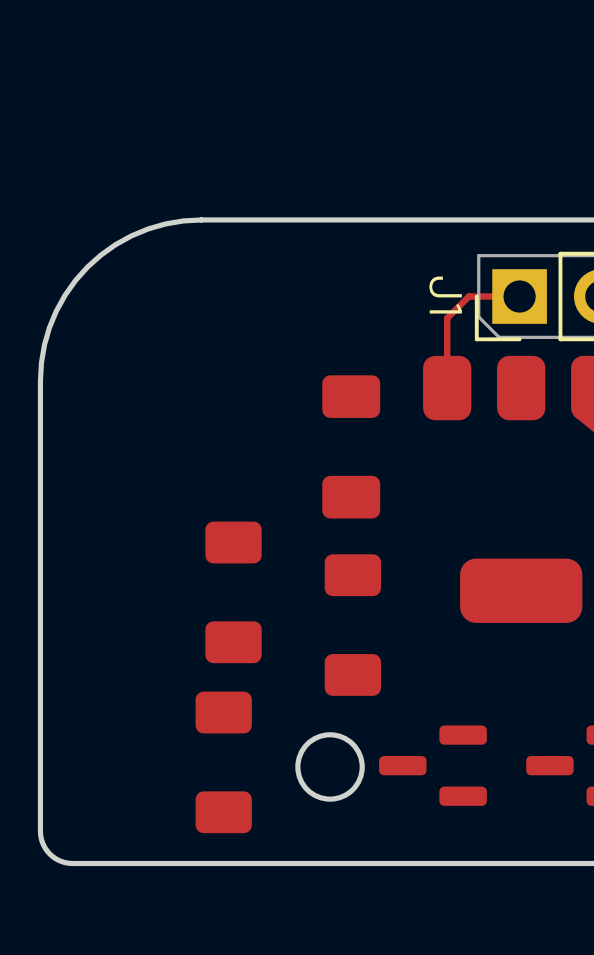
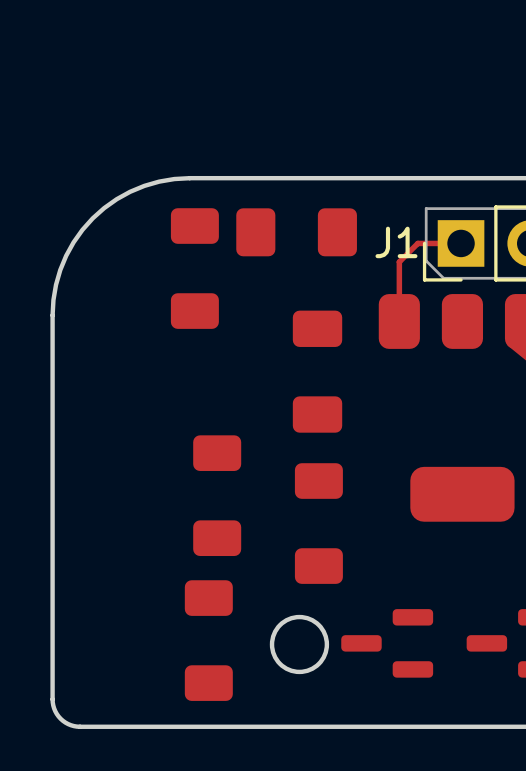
part: none -> (296, 232)
J1 name rotation: 0° (445, 295) -> 90° counterclockwise (396, 242)
part: none -> (194, 268)

